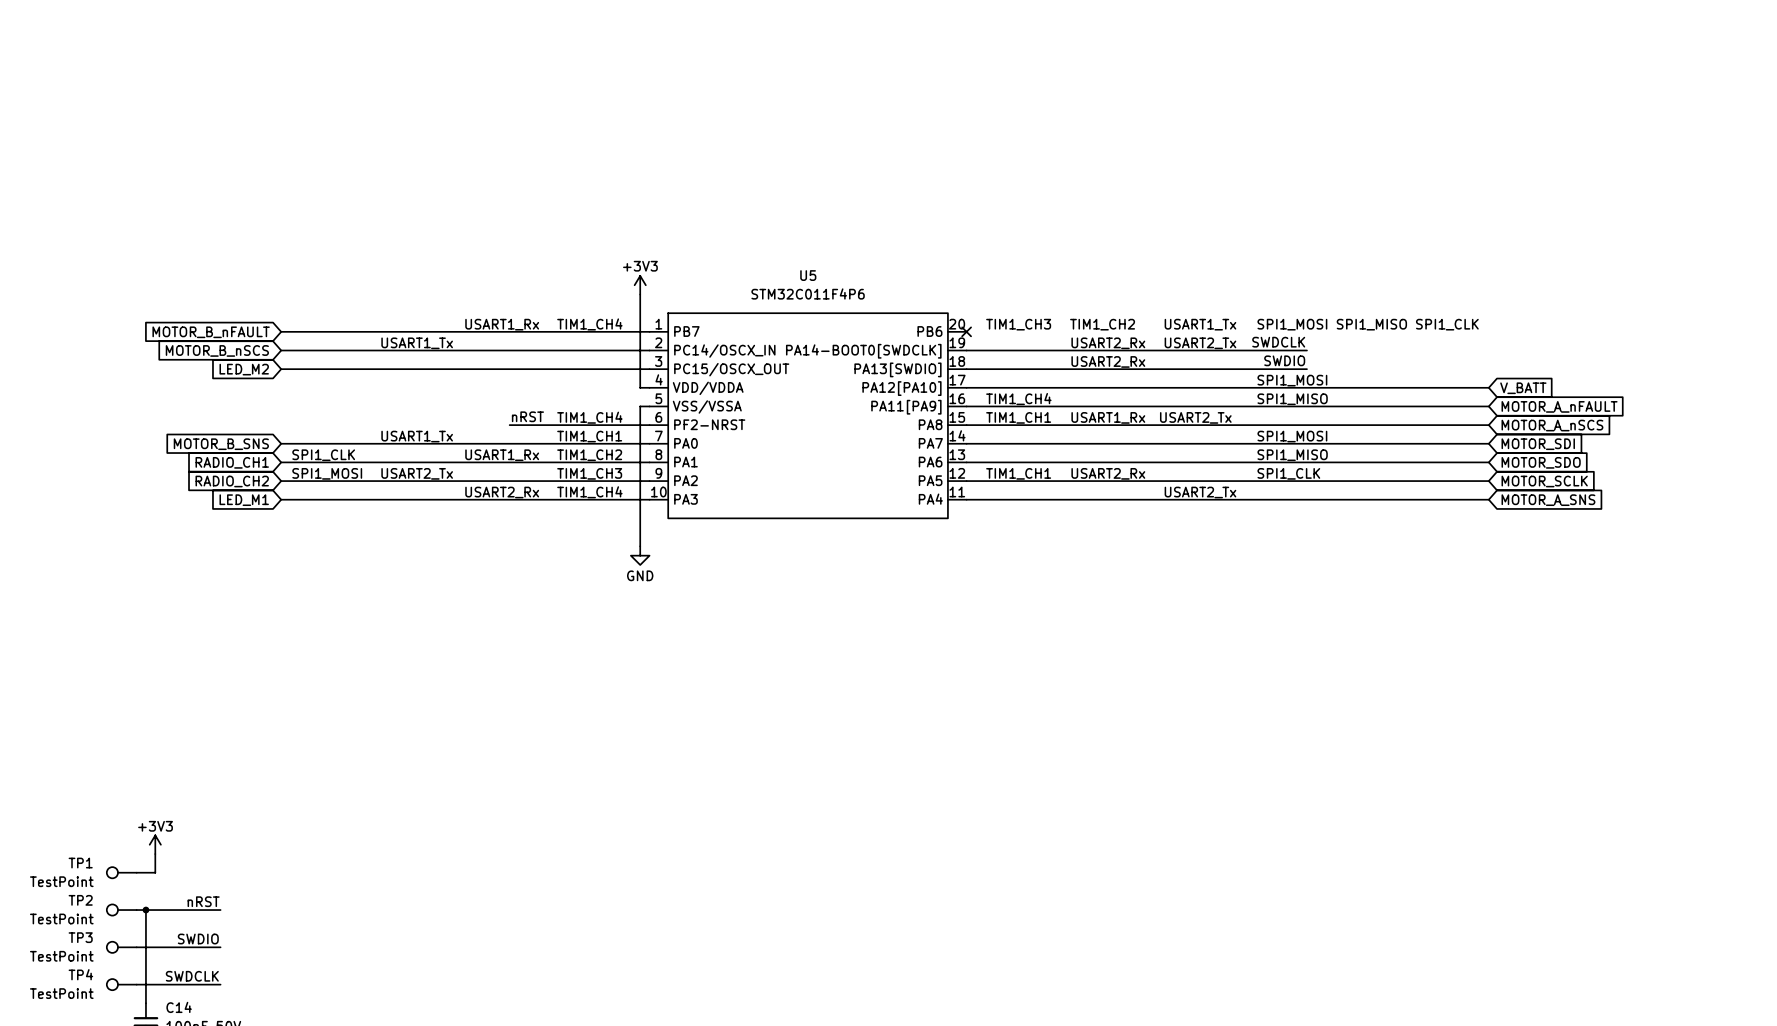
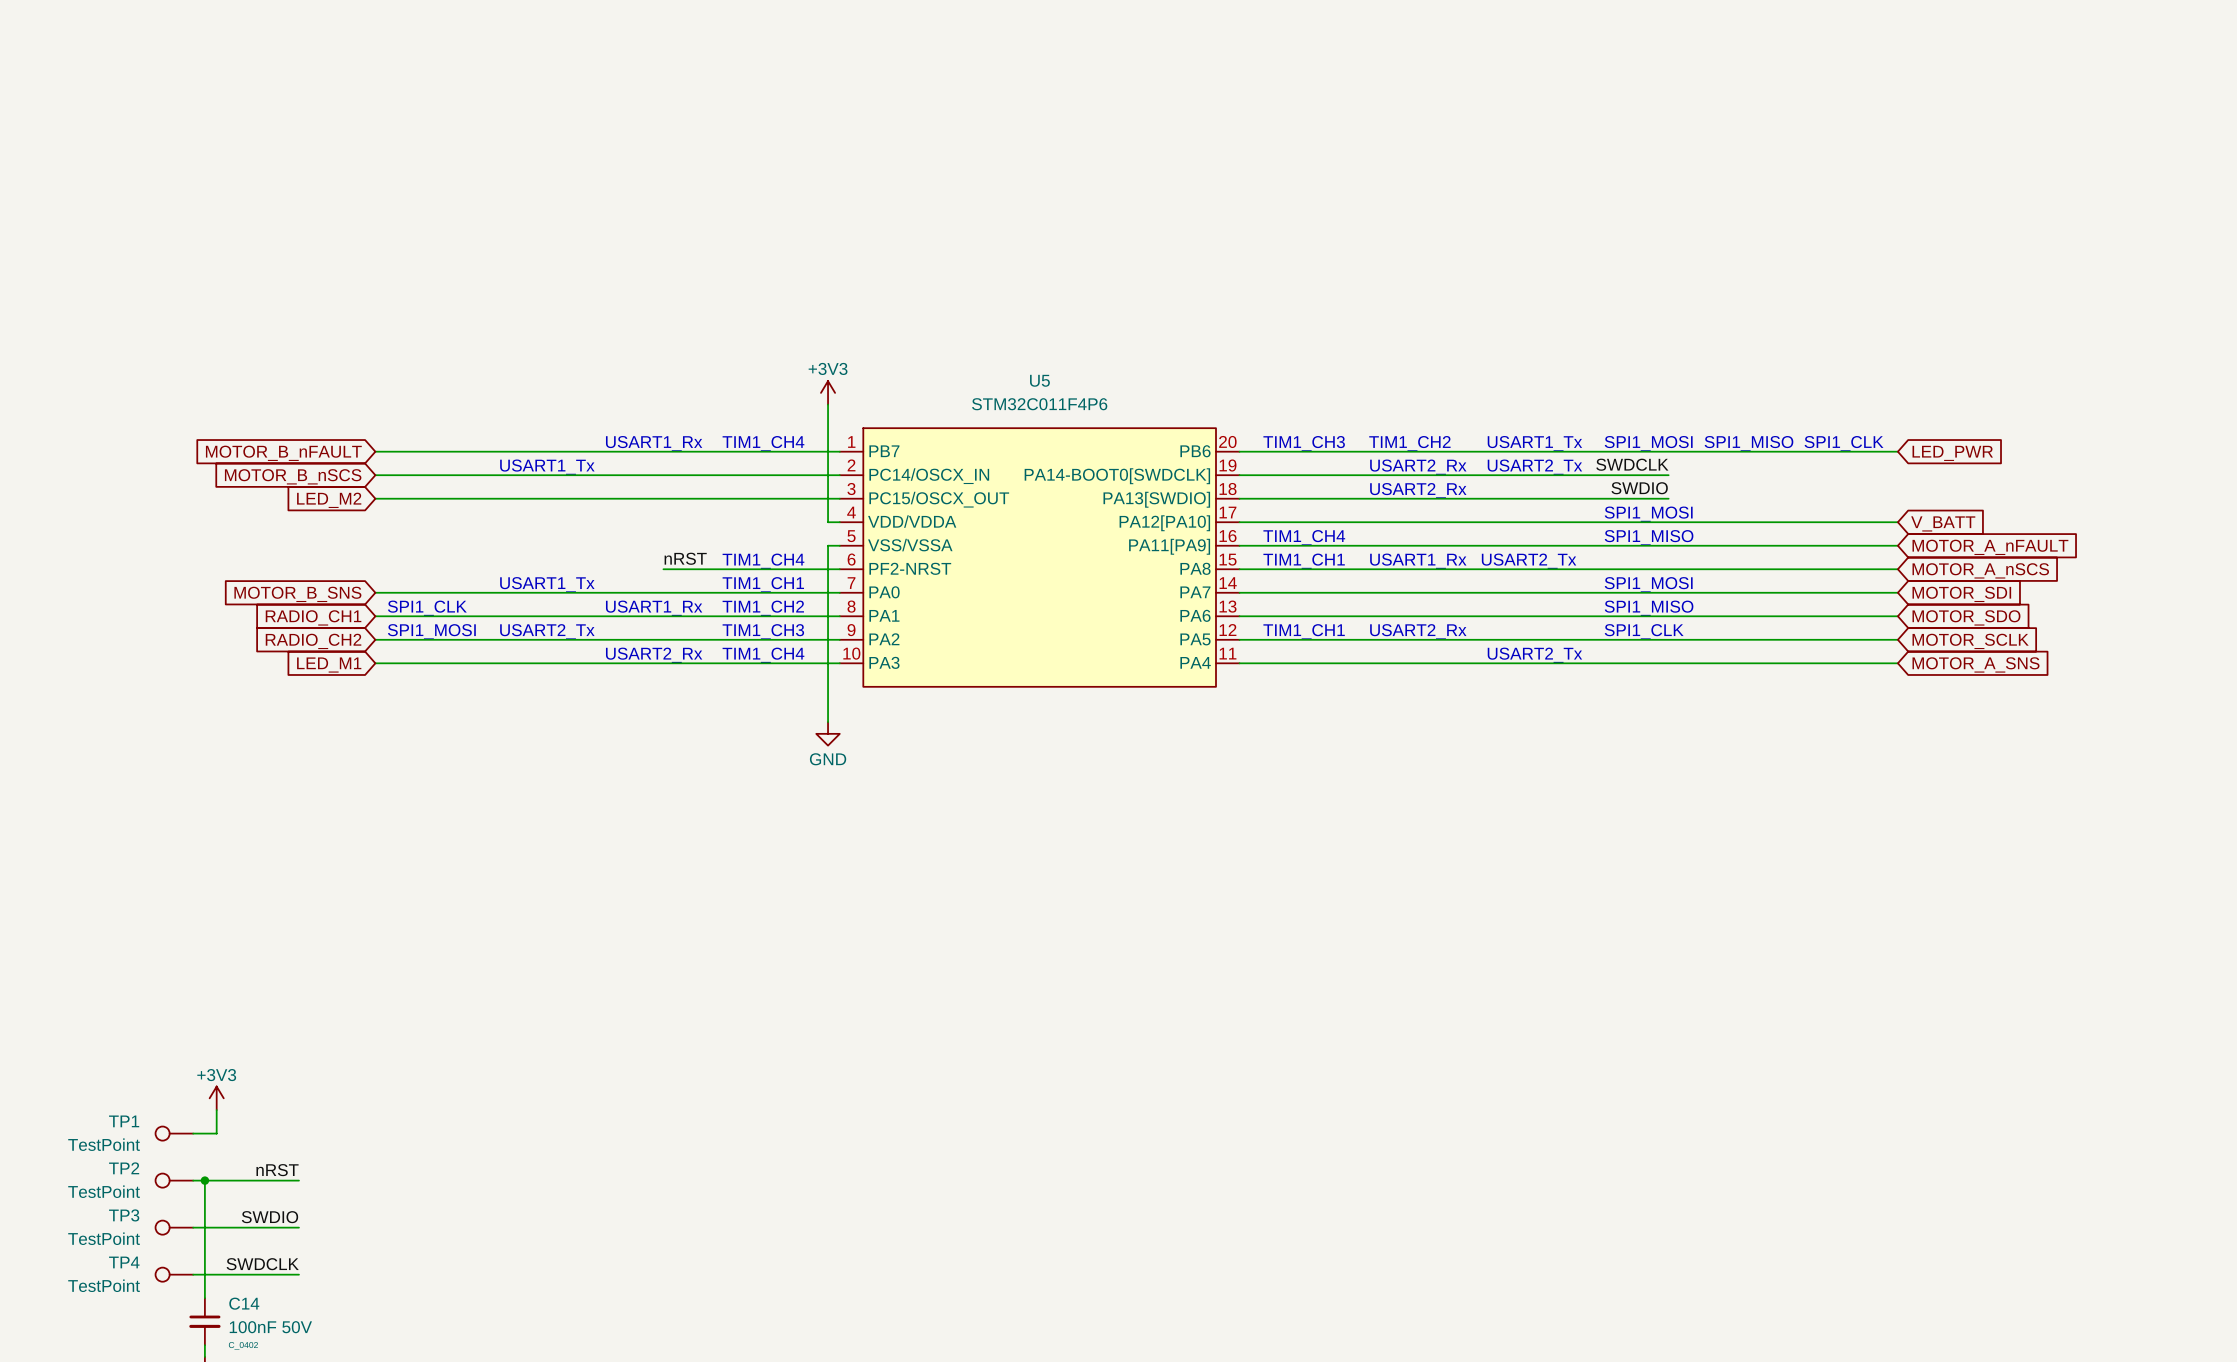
wire: none -> (1239, 451) (1897, 451)
no-connect mark: (966, 331) -> none
global label: none -> LED_PWR (1952, 453)

